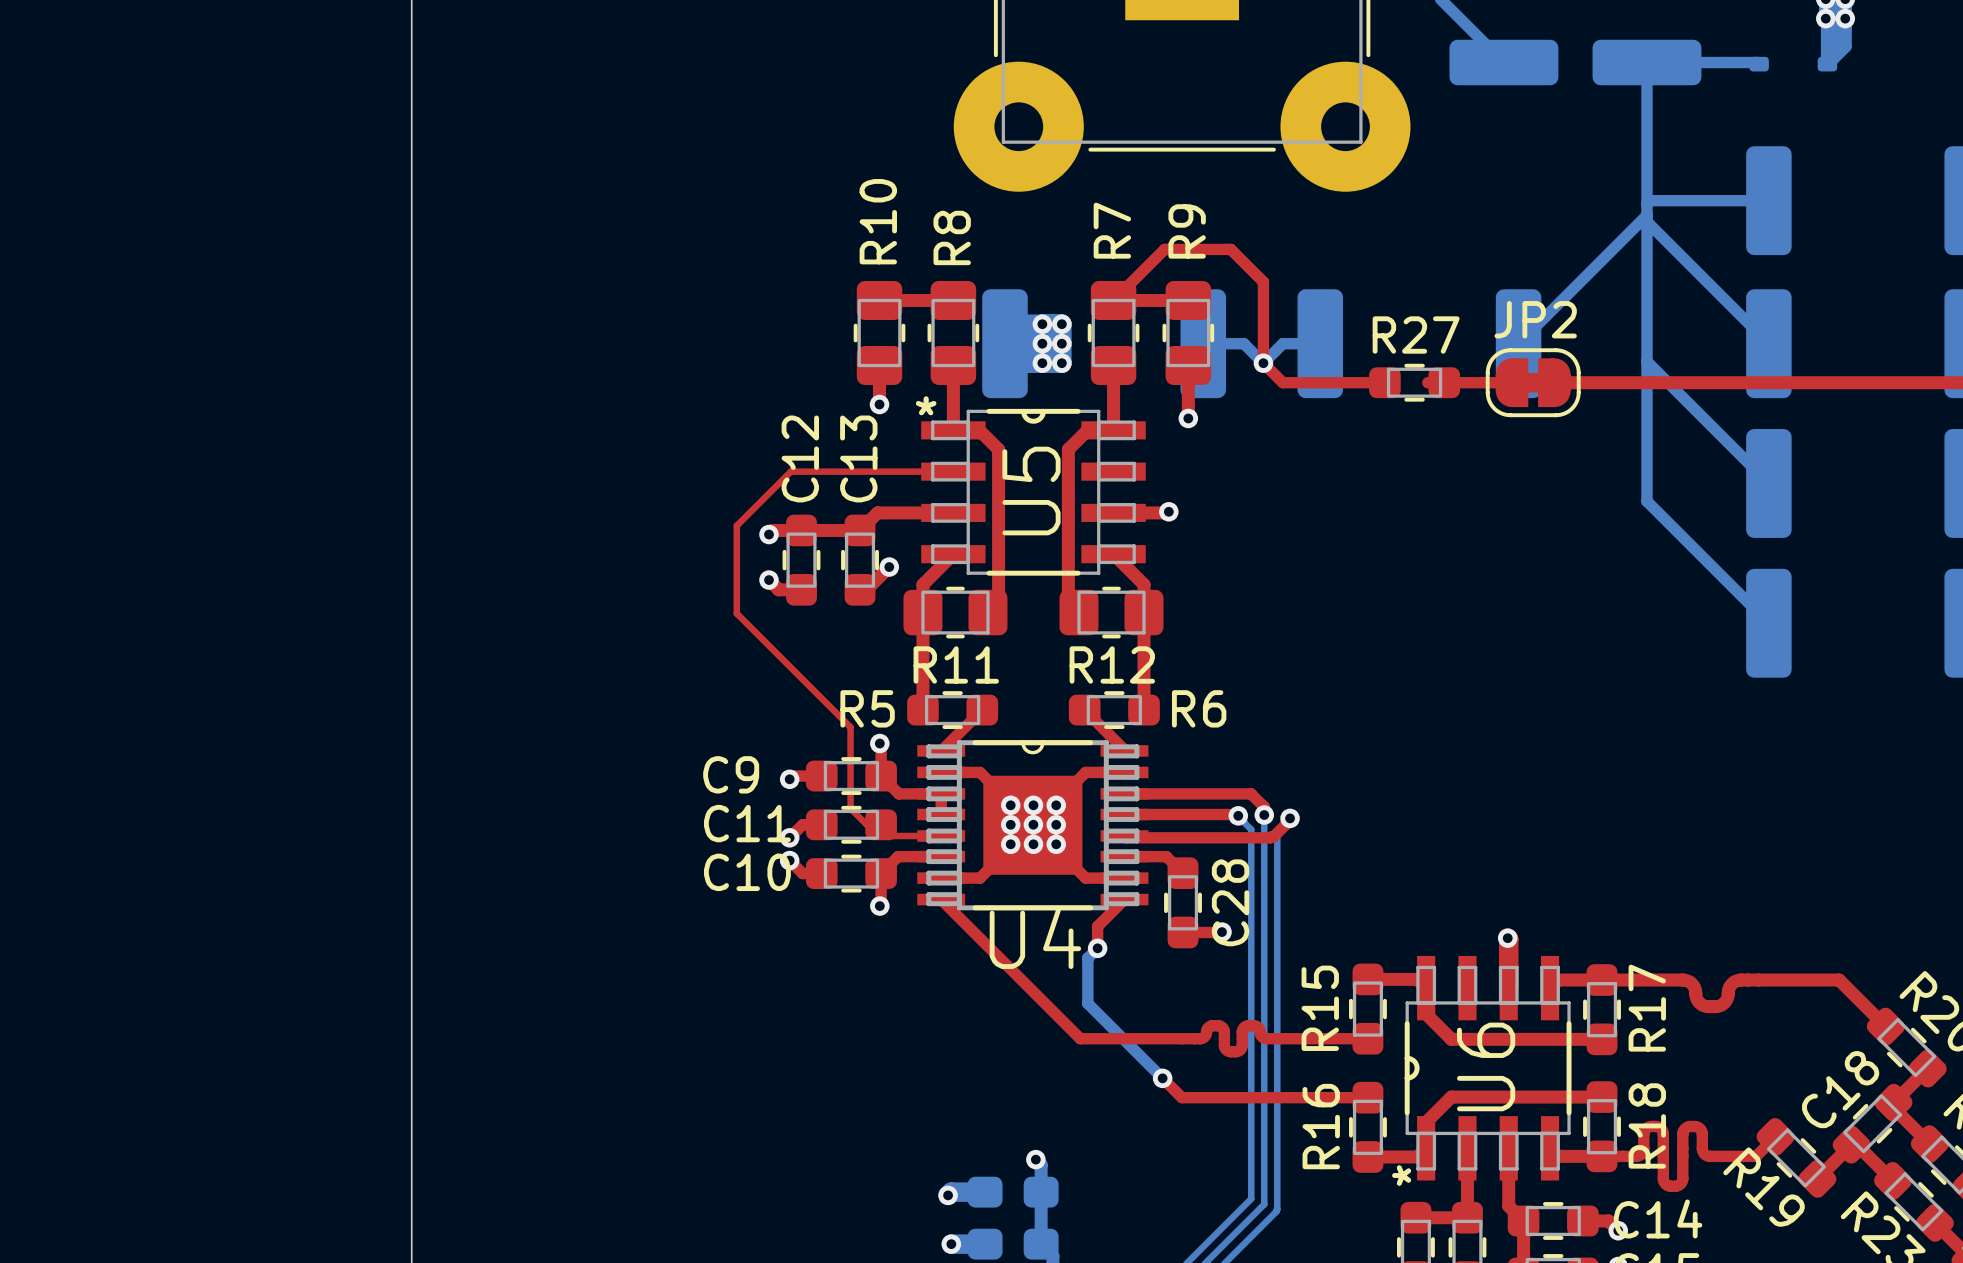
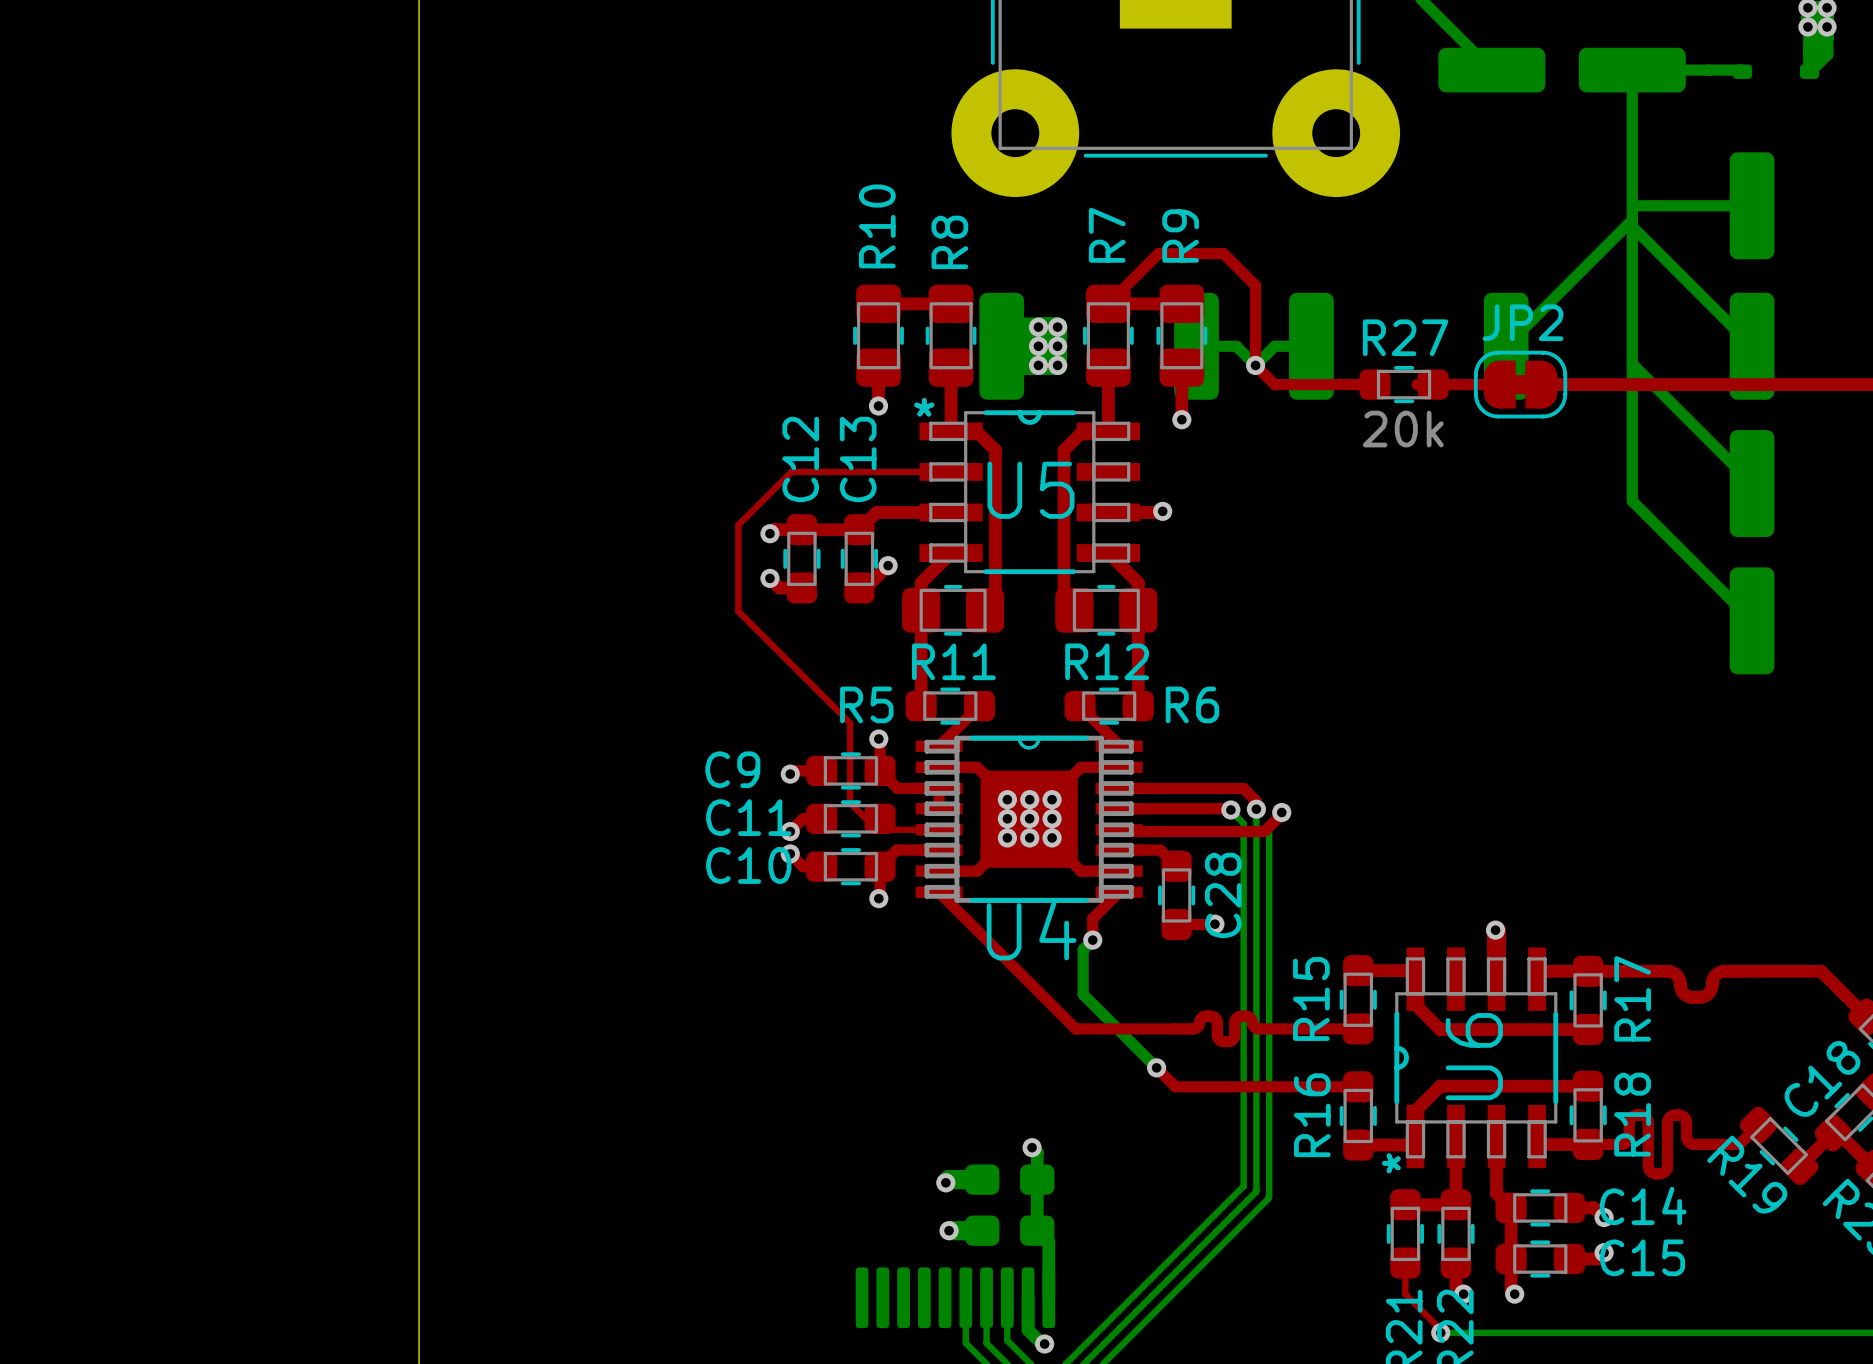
R27 value: none -> 20k (1403, 429)
U5 name rotation: 0° (1031, 491) -> 90° clockwise (1030, 490)

